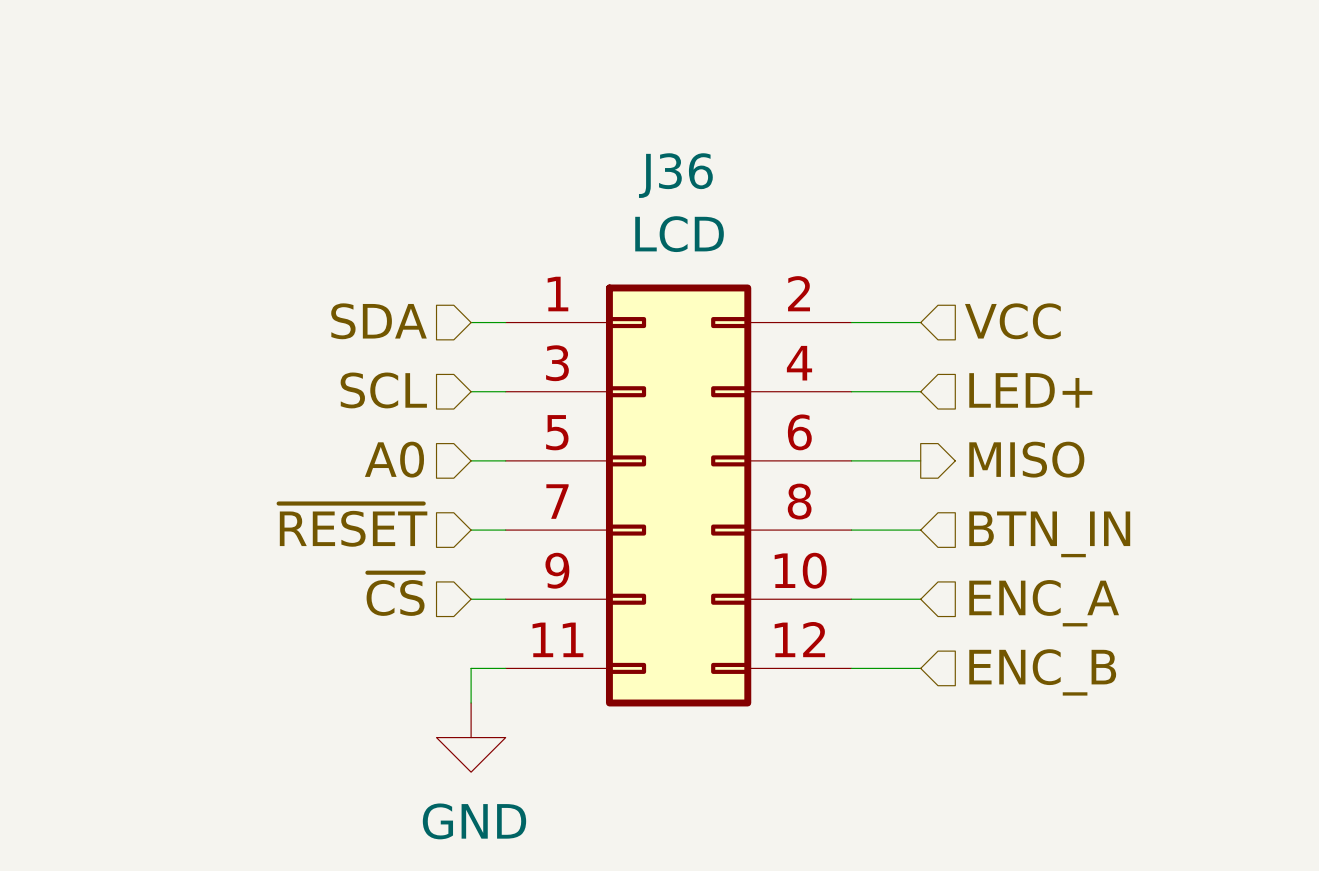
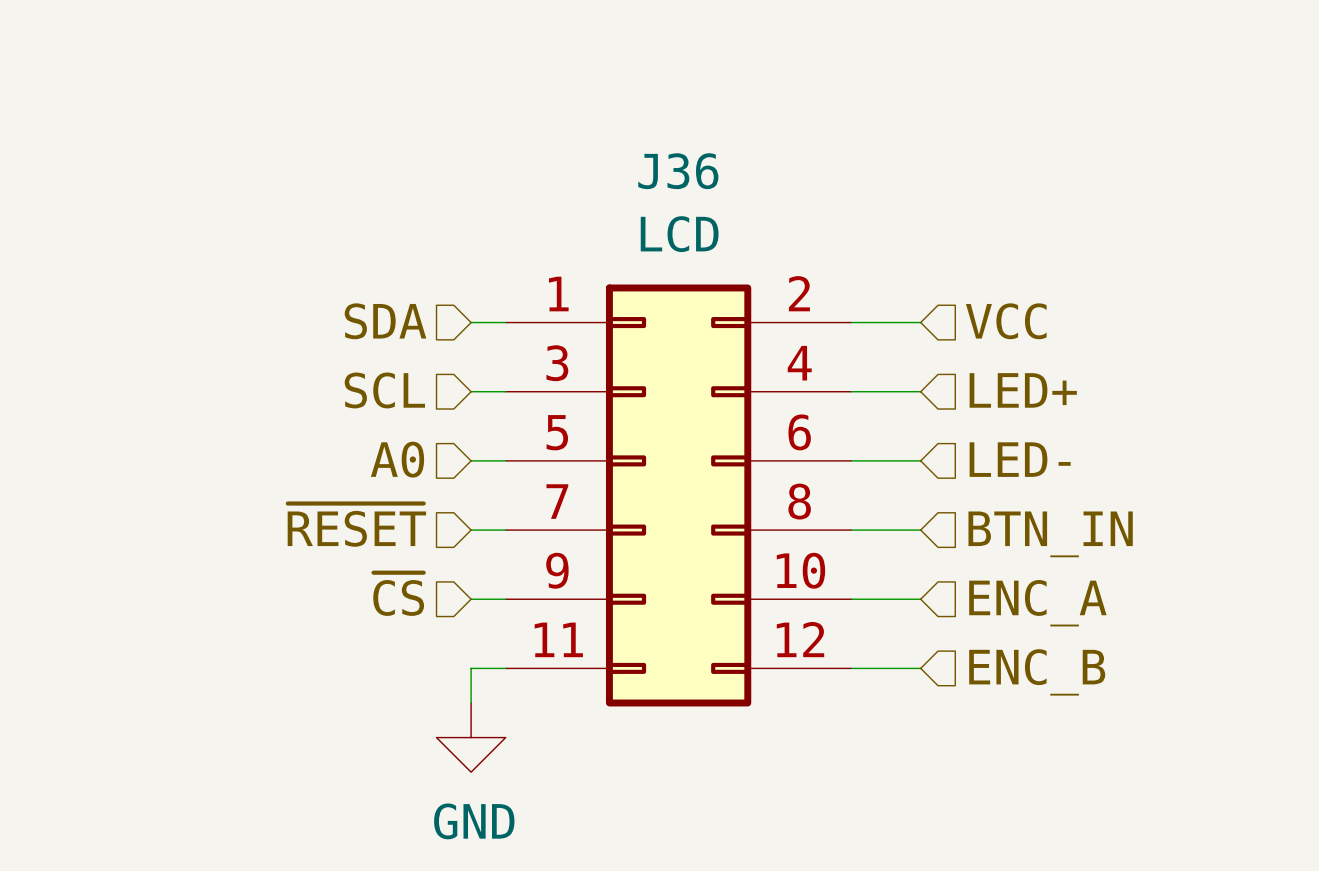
hierarchical label shape: output (1026, 459) -> input (1020, 459)
hierarchical label: MISO (1026, 459) -> LED- (1020, 459)

